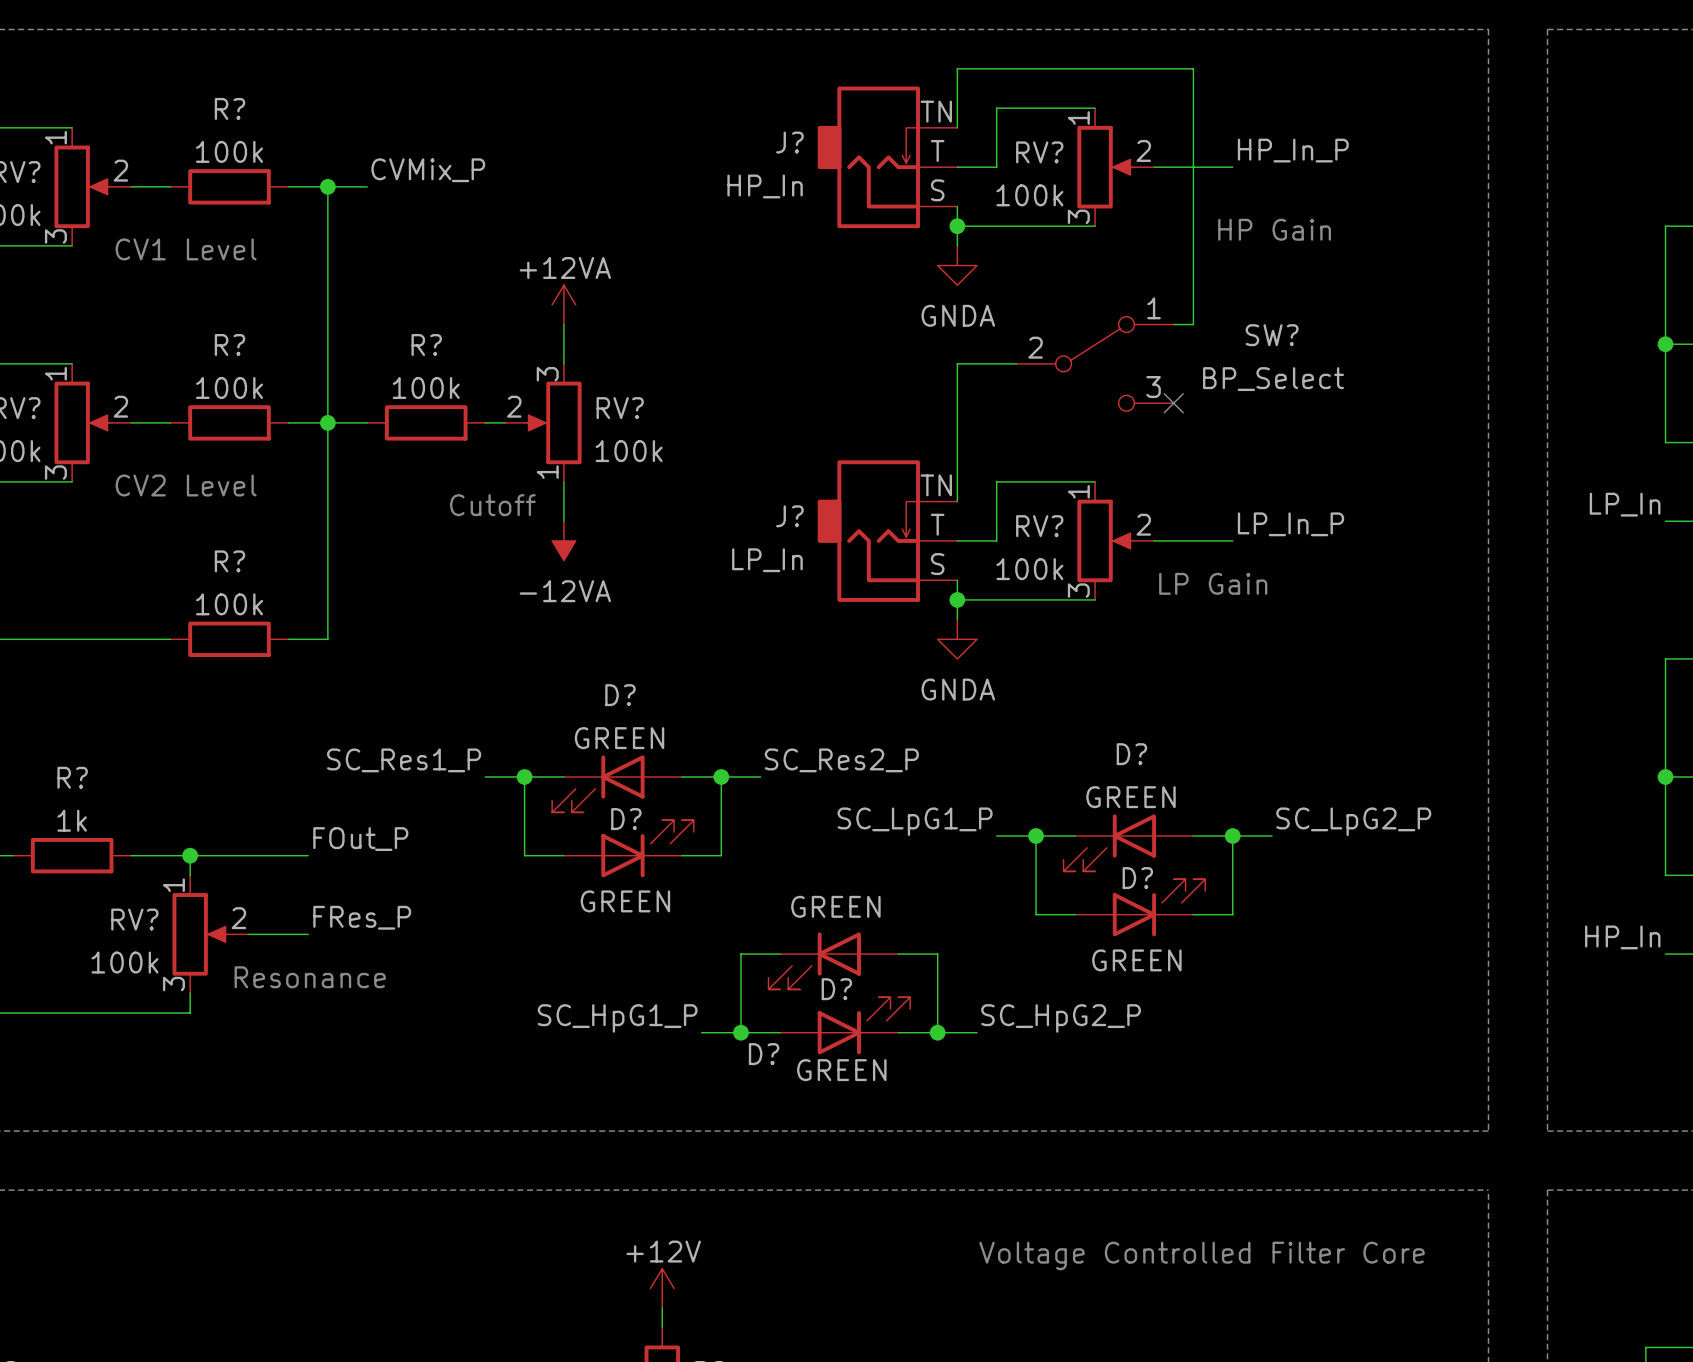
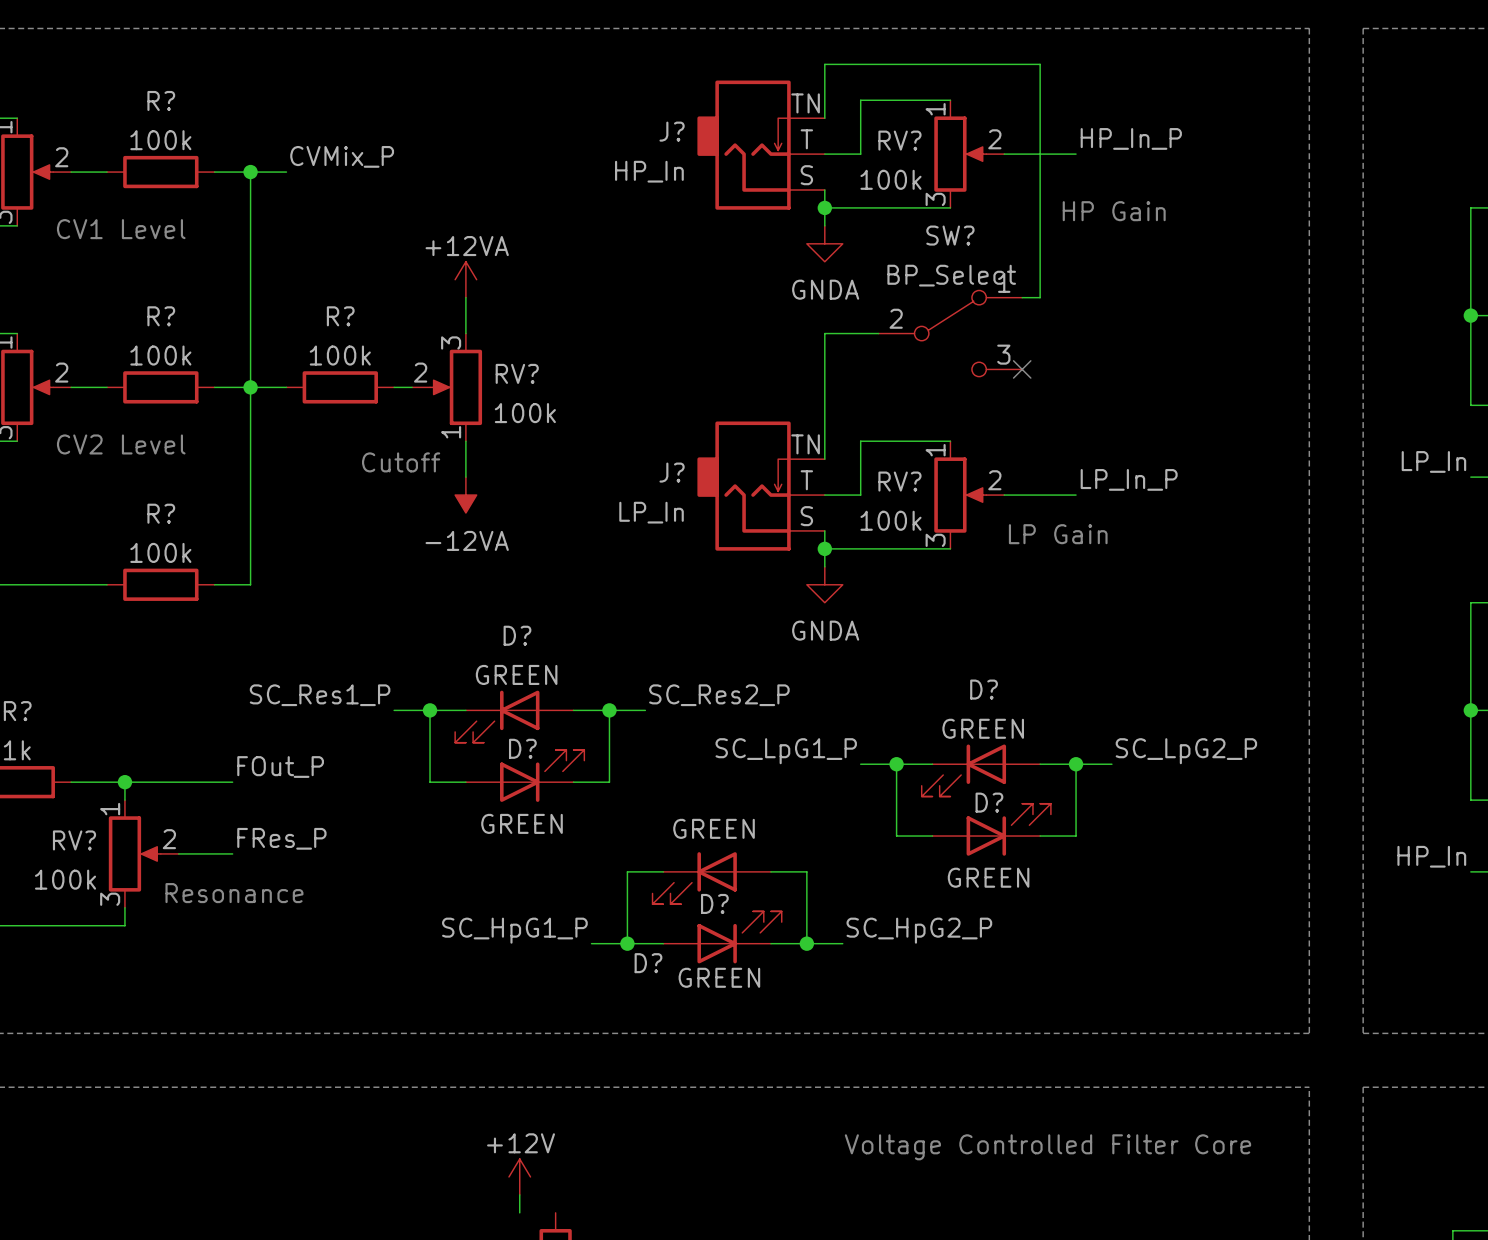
SW? name position: SW? (1272, 335) -> SW? (950, 235)
SW? value position: BP_Select (1273, 379) -> BP_Select (951, 275)
power symbol position: +12V (662, 1288) -> +12V (519, 1176)
wire: (662, 1308) (662, 1327) -> (519, 1194) (519, 1212)

